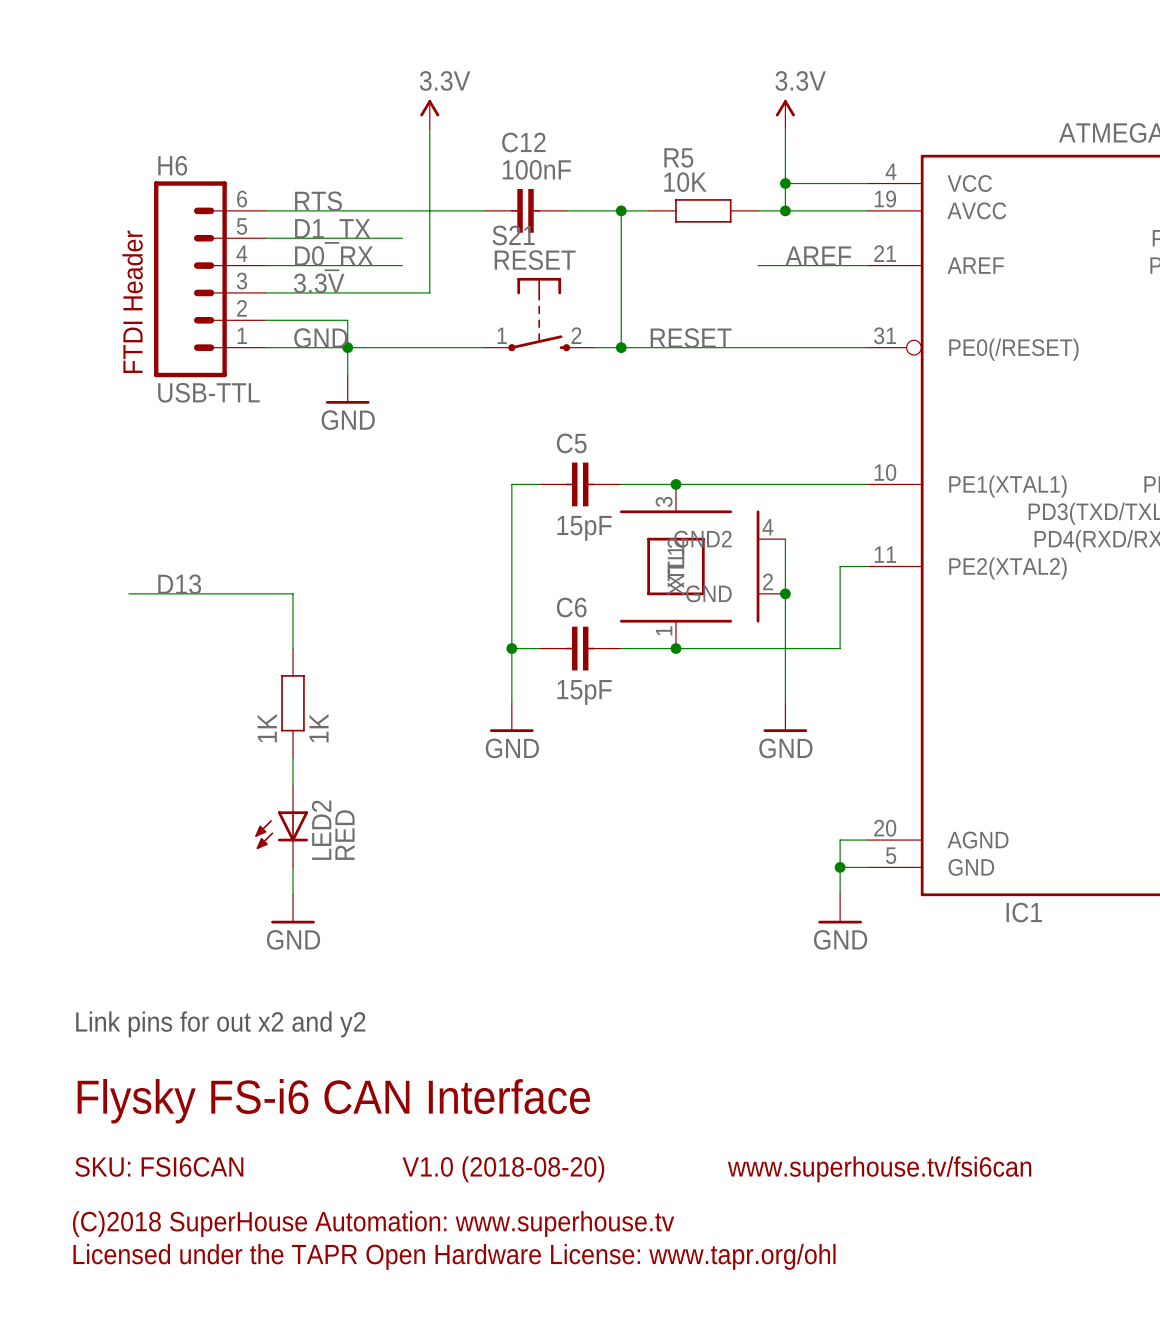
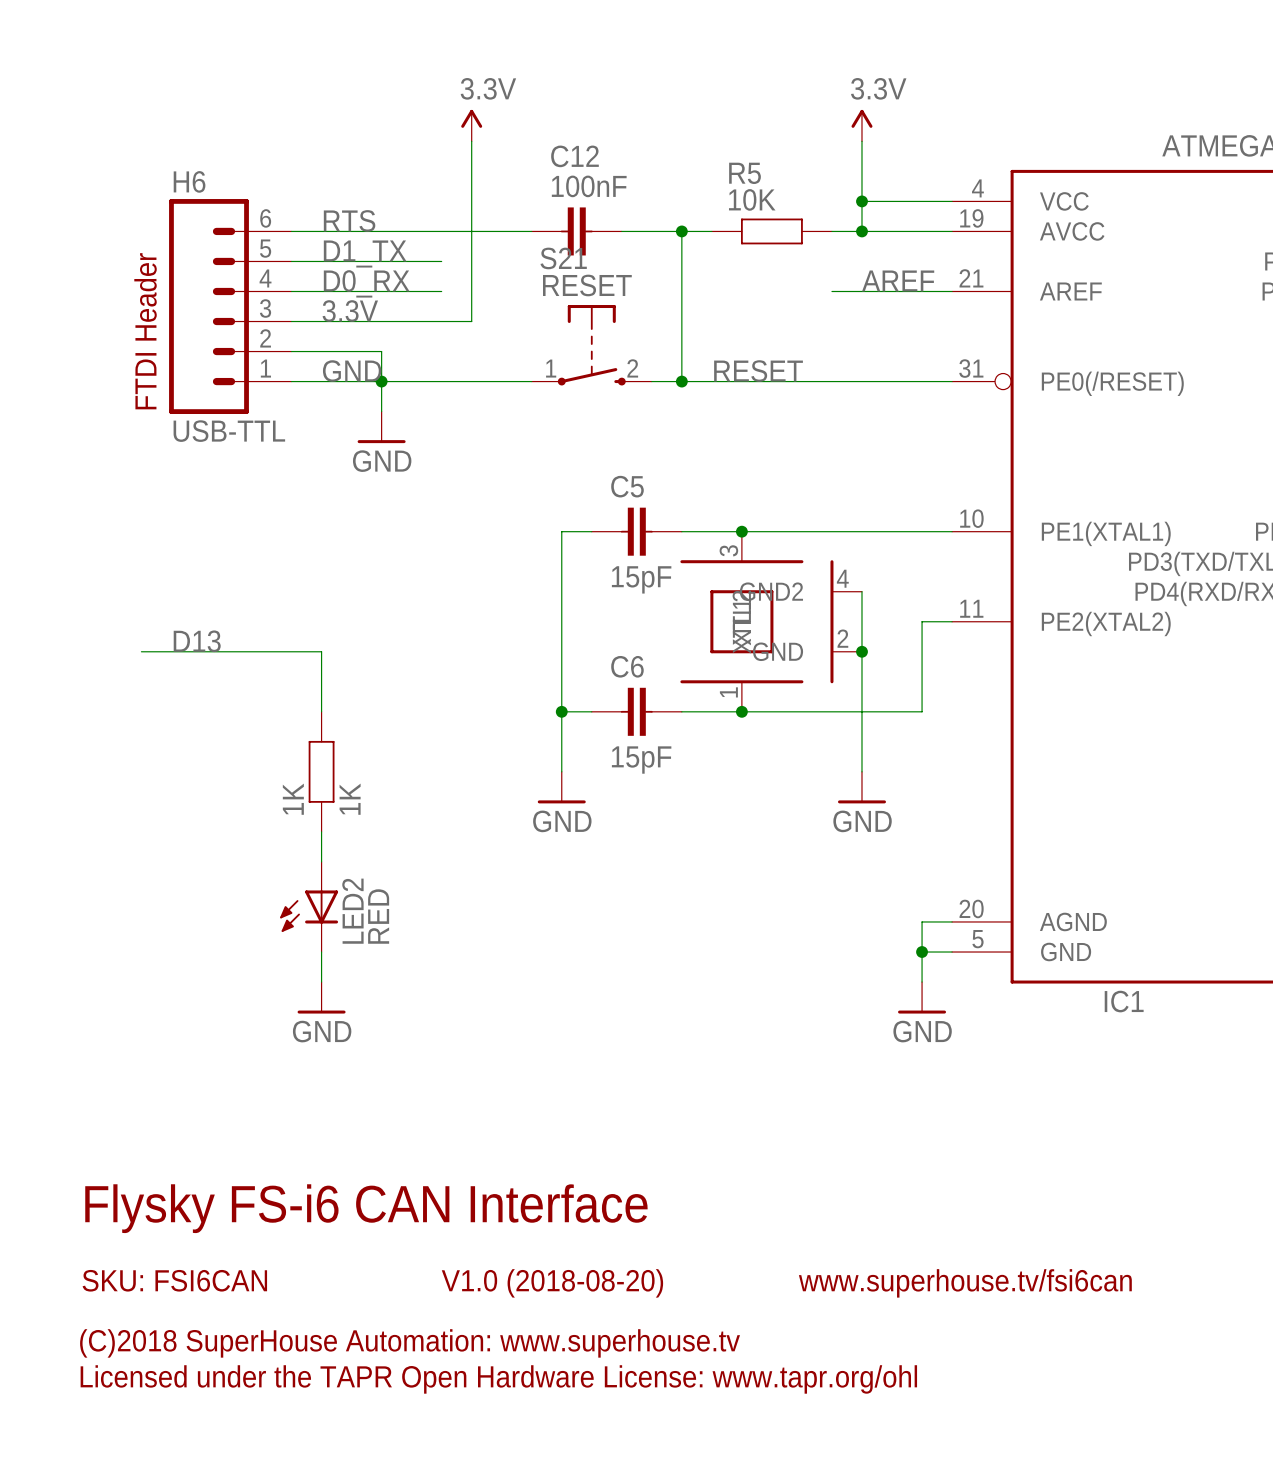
text: Link pins for out x2 and y2 (220, 1024) -> none

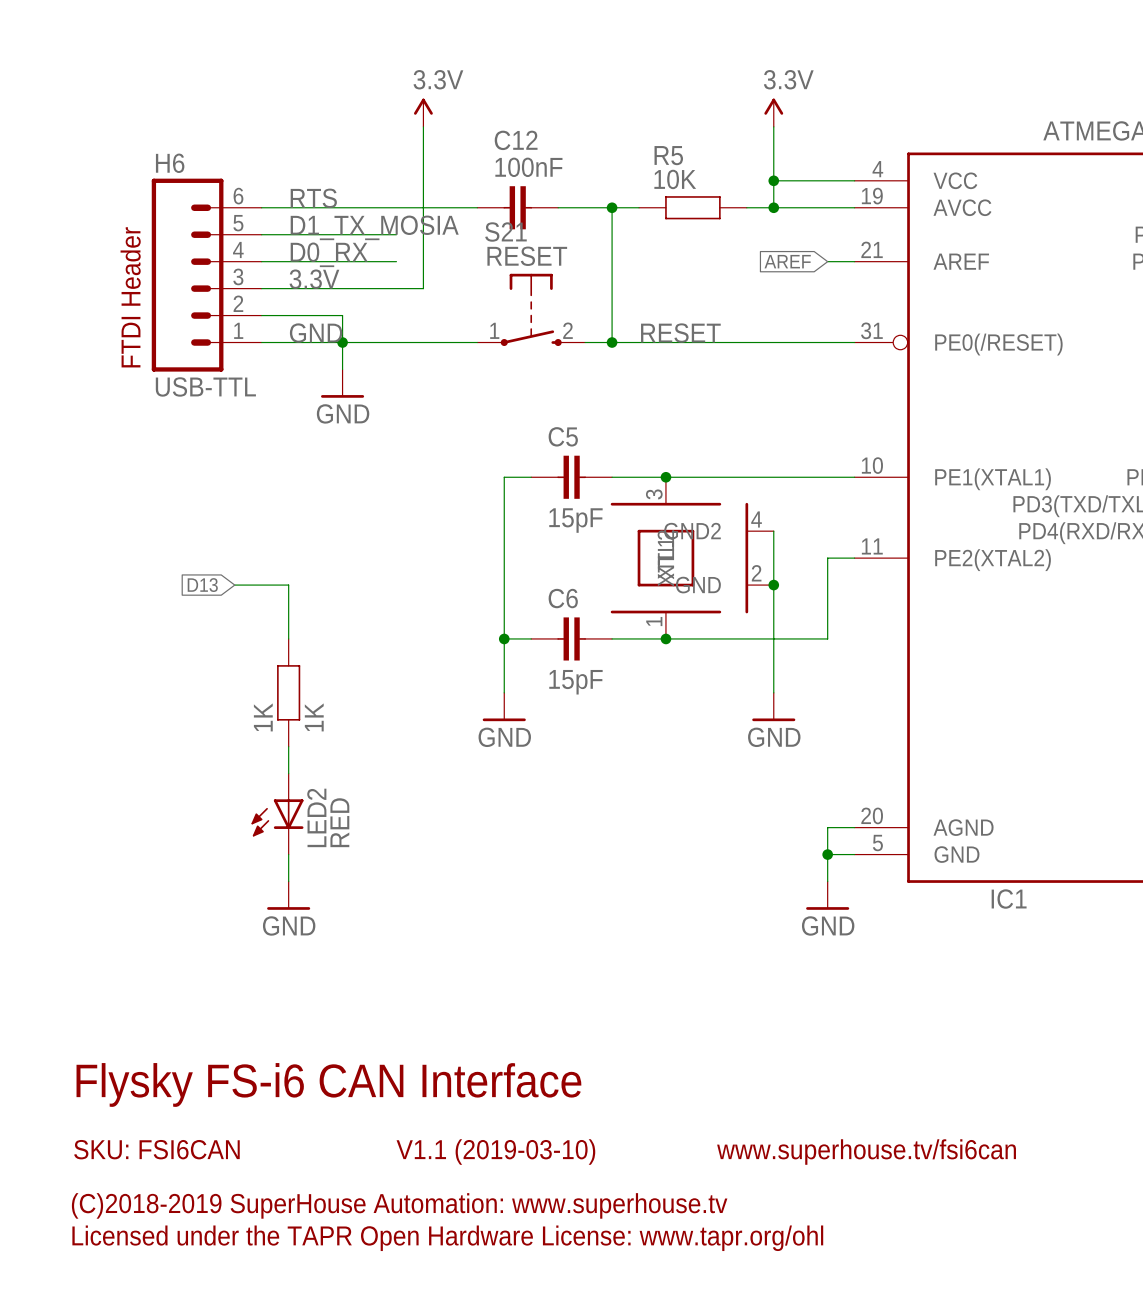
label: D1_TX (365, 254) -> D1_TX_MOSIA (374, 227)
label: AREF (898, 280) -> none
wire: (831, 291) (922, 291) -> none
global label: none -> AREF (787, 261)
label: D13 (197, 641) -> none
wire: (141, 651) (261, 651) -> none
global label: none -> D13 (202, 585)
text: V1.0 (2018-08-20) (552, 1283) -> V1.1 (2019-03-10) (495, 1152)
text: (C)2018 SuperHouse Automation: www.superhouse.tv (410, 1343) -> (C)2018-2019 SuperHouse Automation: www.superhouse.tv (399, 1205)

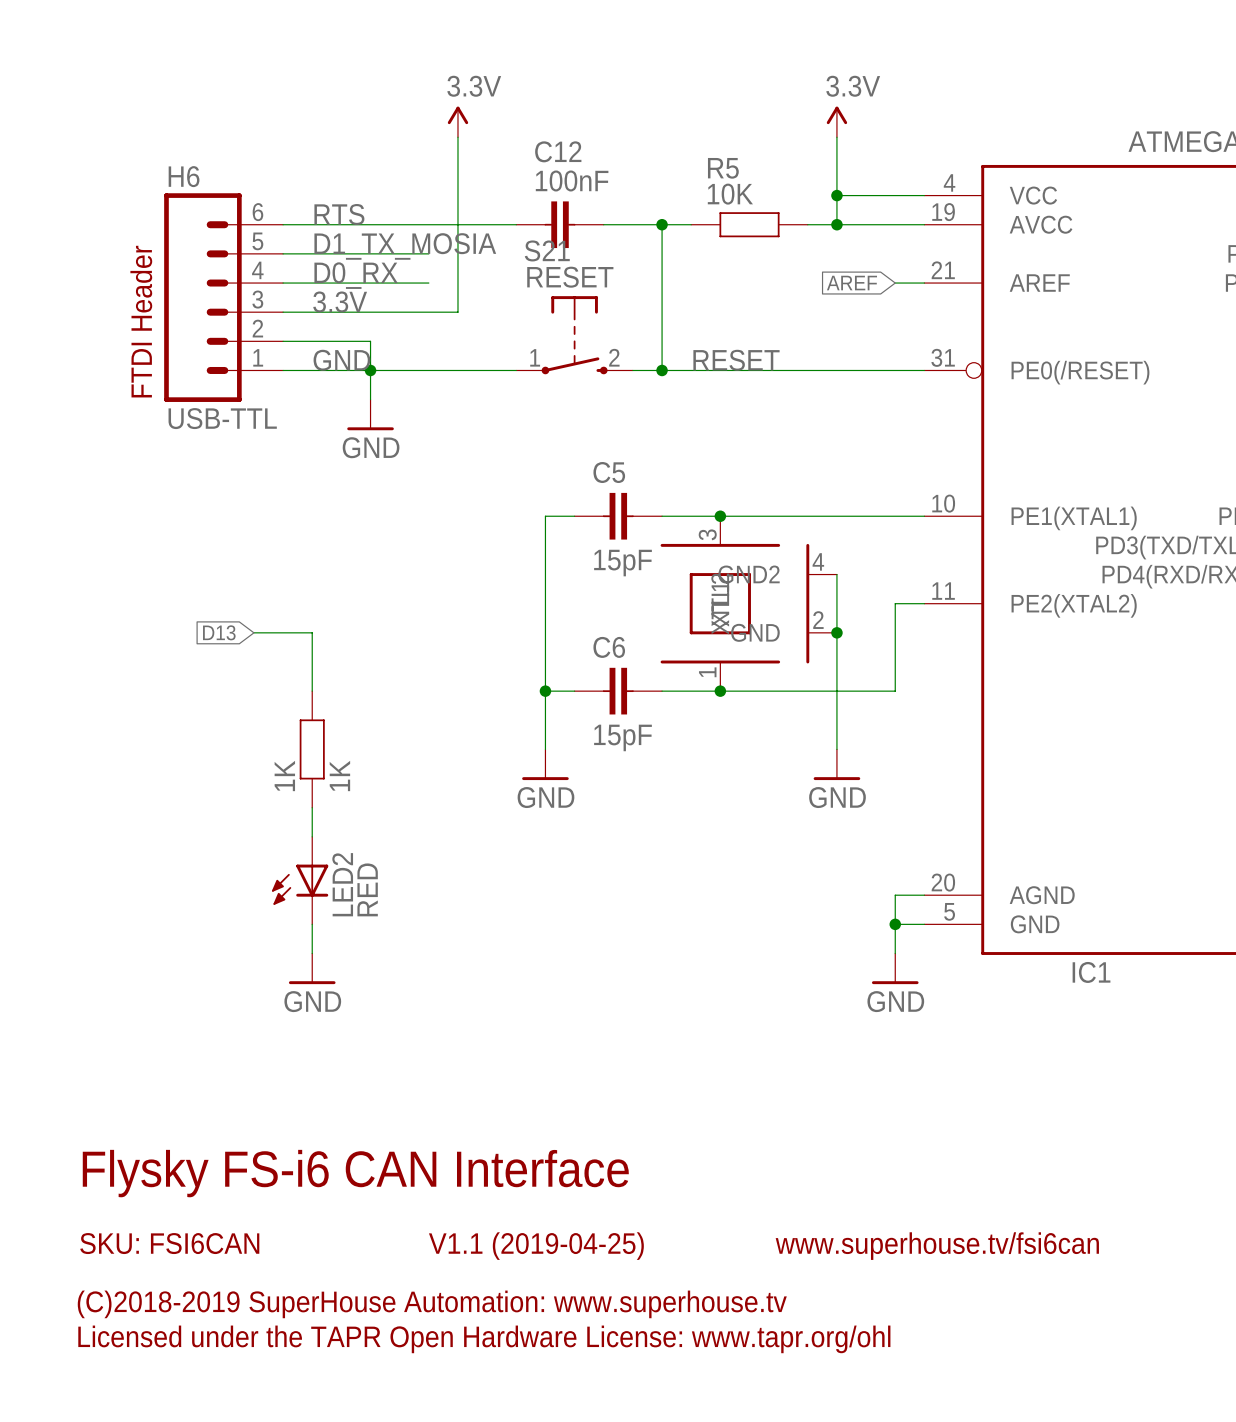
text: V1.1 (2019-03-10) (495, 1152) -> V1.1 (2019-04-25) (536, 1246)

